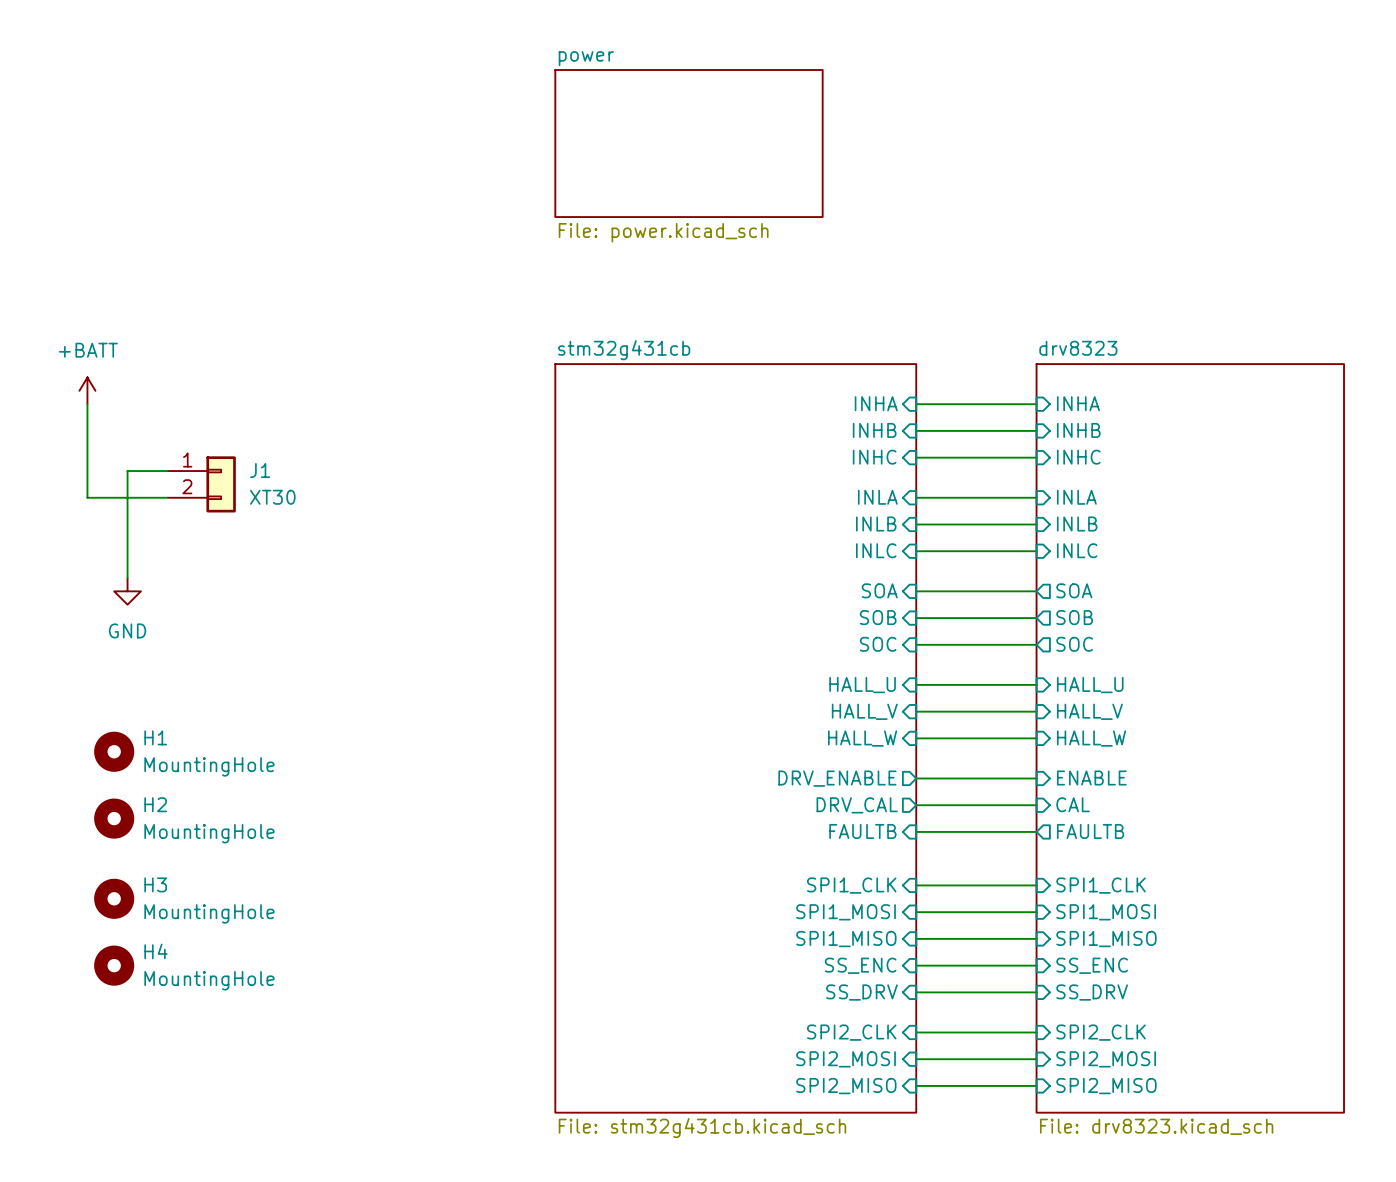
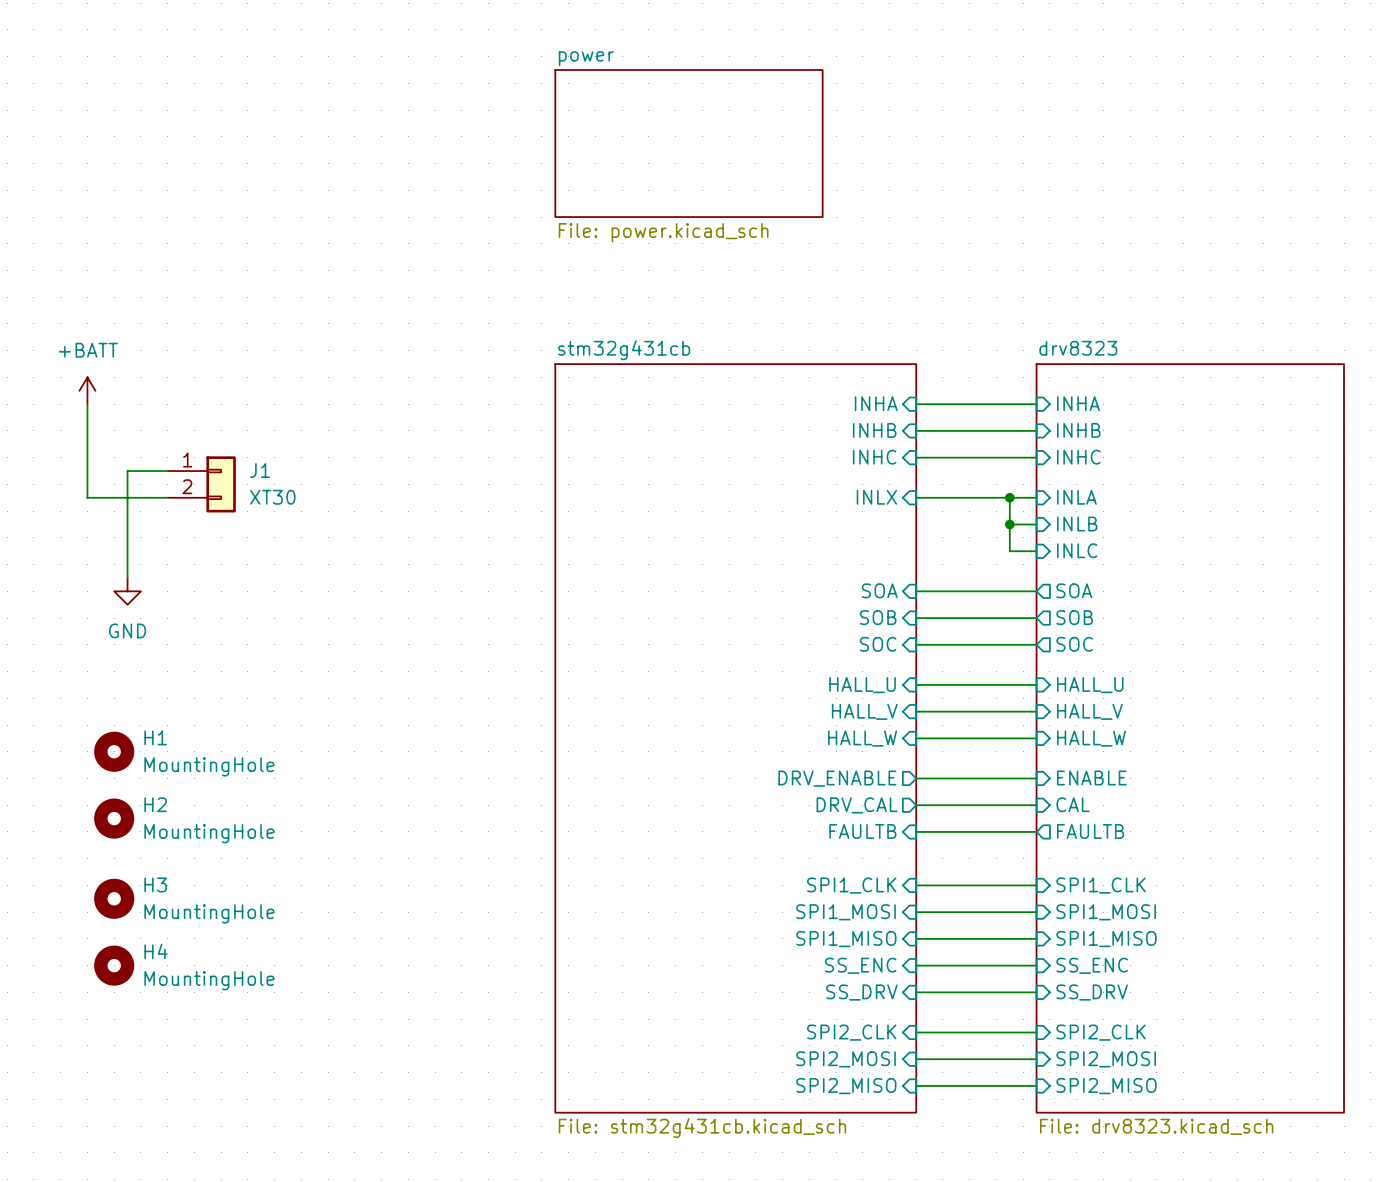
sheet pin: INLA (877, 497) -> INLX (876, 497)
junction: none -> (1009, 497)
sheet pin: INLB (876, 524) -> none
wire: (916, 524) (1009, 524) -> none
junction: none -> (1009, 524)
sheet pin: INLC (876, 550) -> none
wire: (916, 551) (1009, 551) -> (1009, 497) (1009, 551)

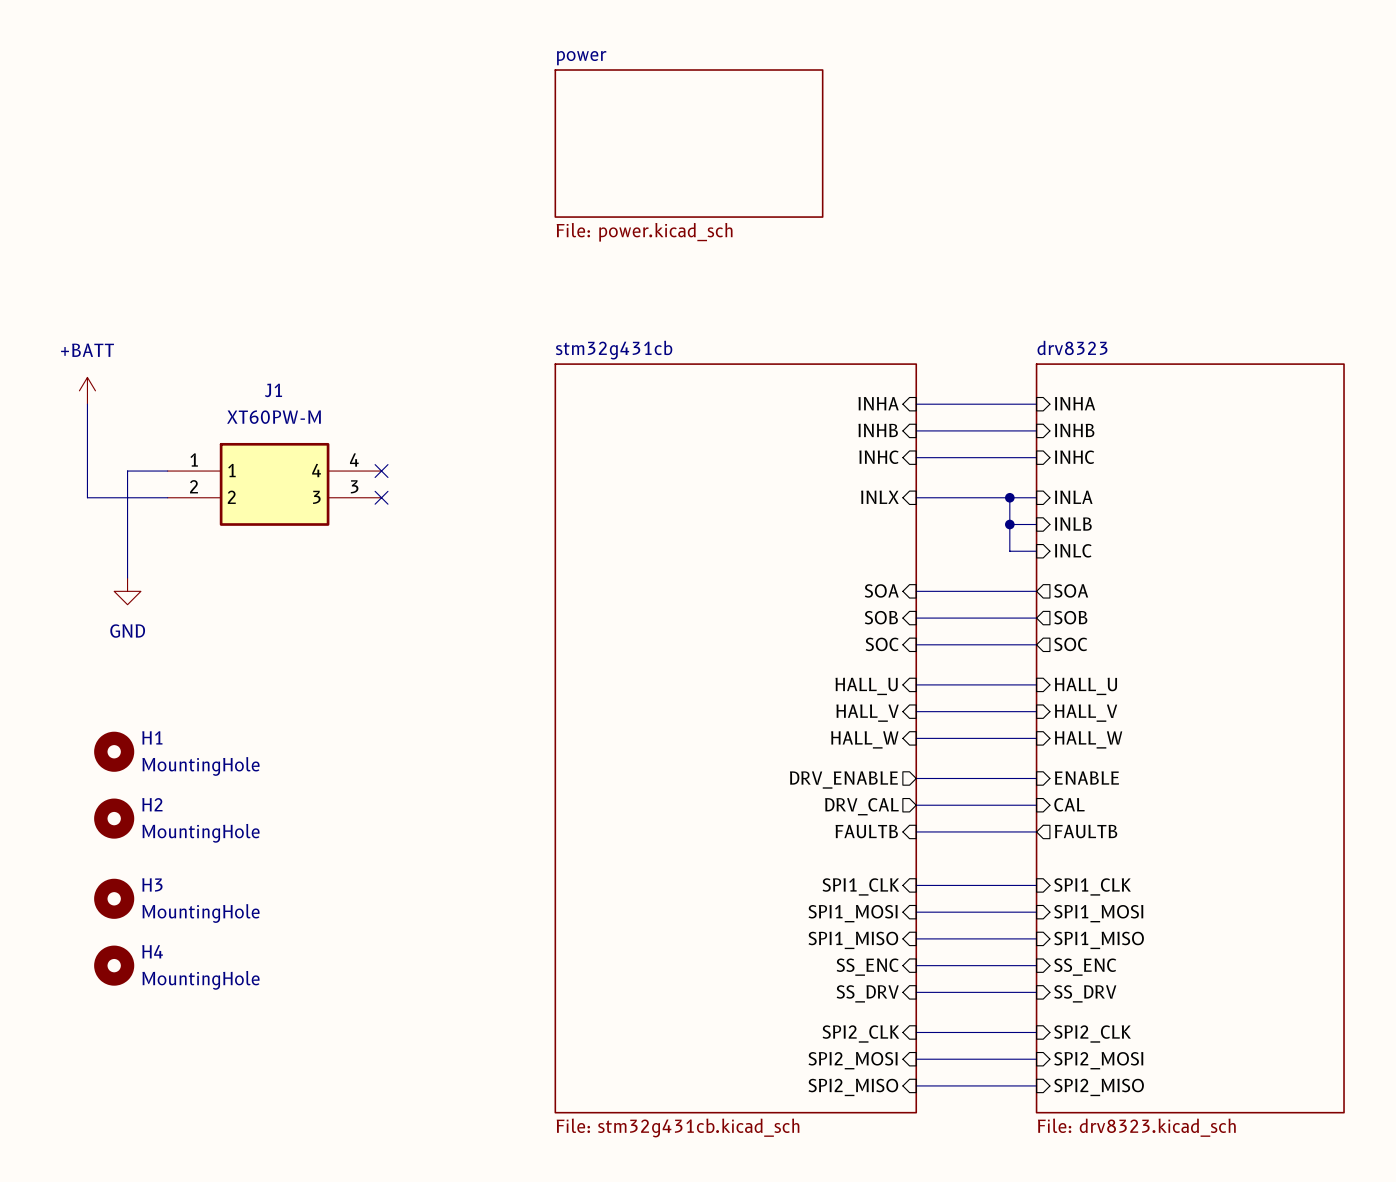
J1 symbol: [167, 456, 236, 513] -> [167, 442, 382, 526]
J1 name position: J1 (260, 470) -> J1 (273, 390)
no-connect mark: none -> (381, 471)
J1 value: XT30 (272, 497) -> XT60PW-M (273, 417)
no-connect mark: none -> (381, 497)

